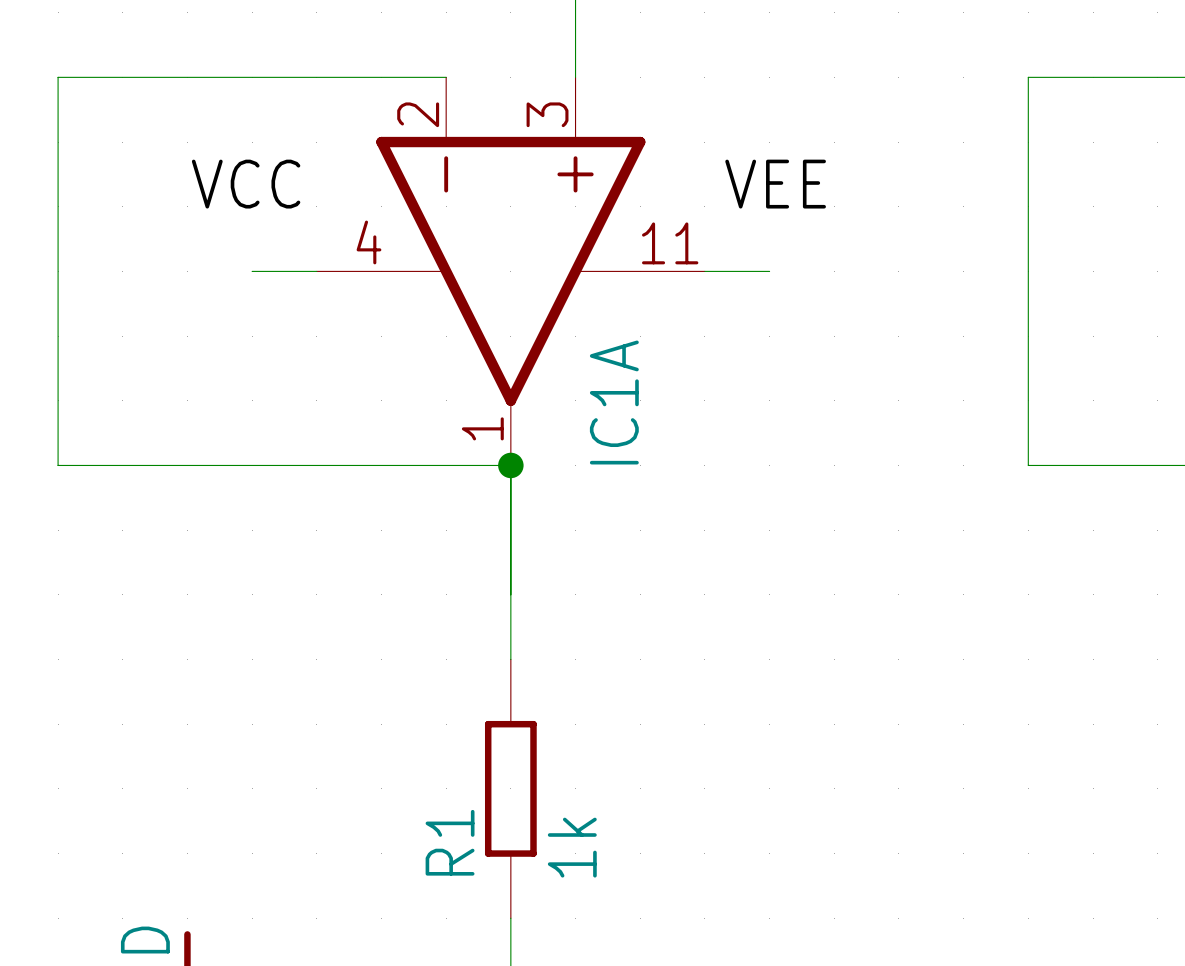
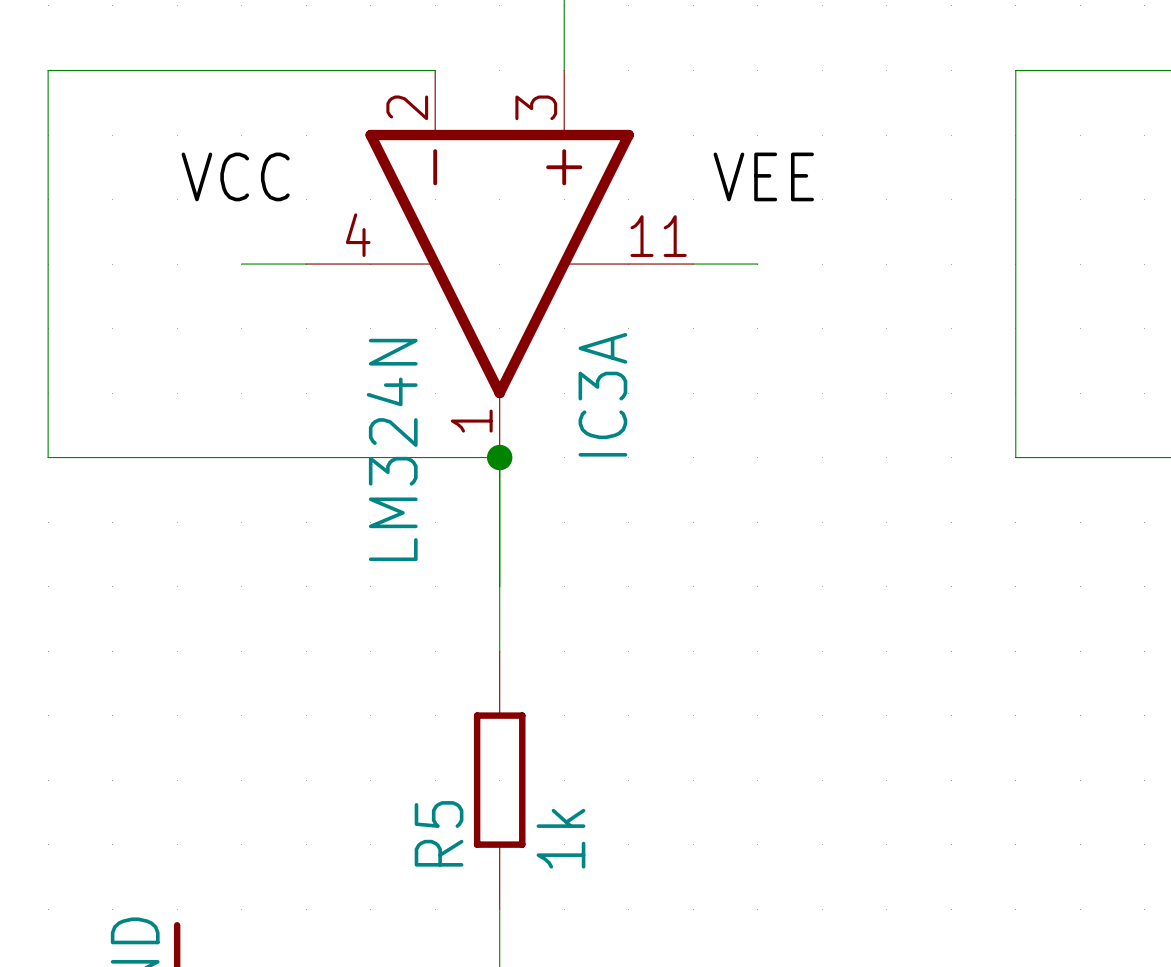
IC1A name: IC1A (614, 402) -> IC3A (602, 394)
IC1A value: none -> LM324N (392, 449)
R1 name: R1 (450, 842) -> R5 (439, 833)

